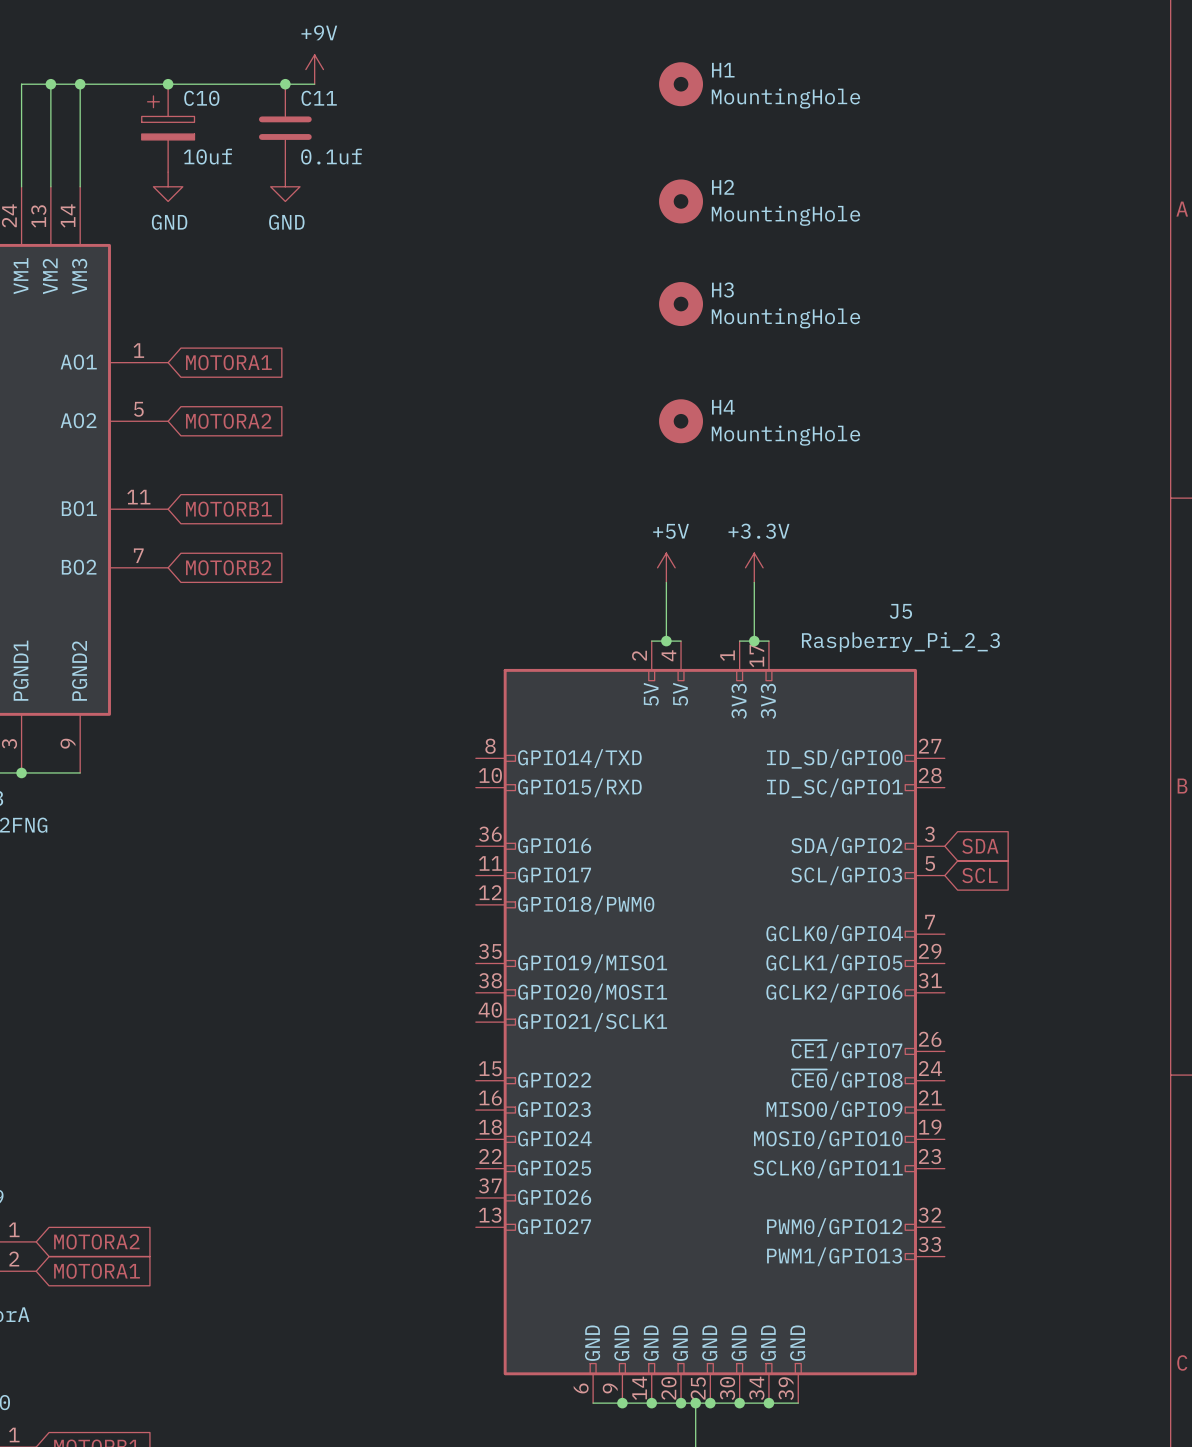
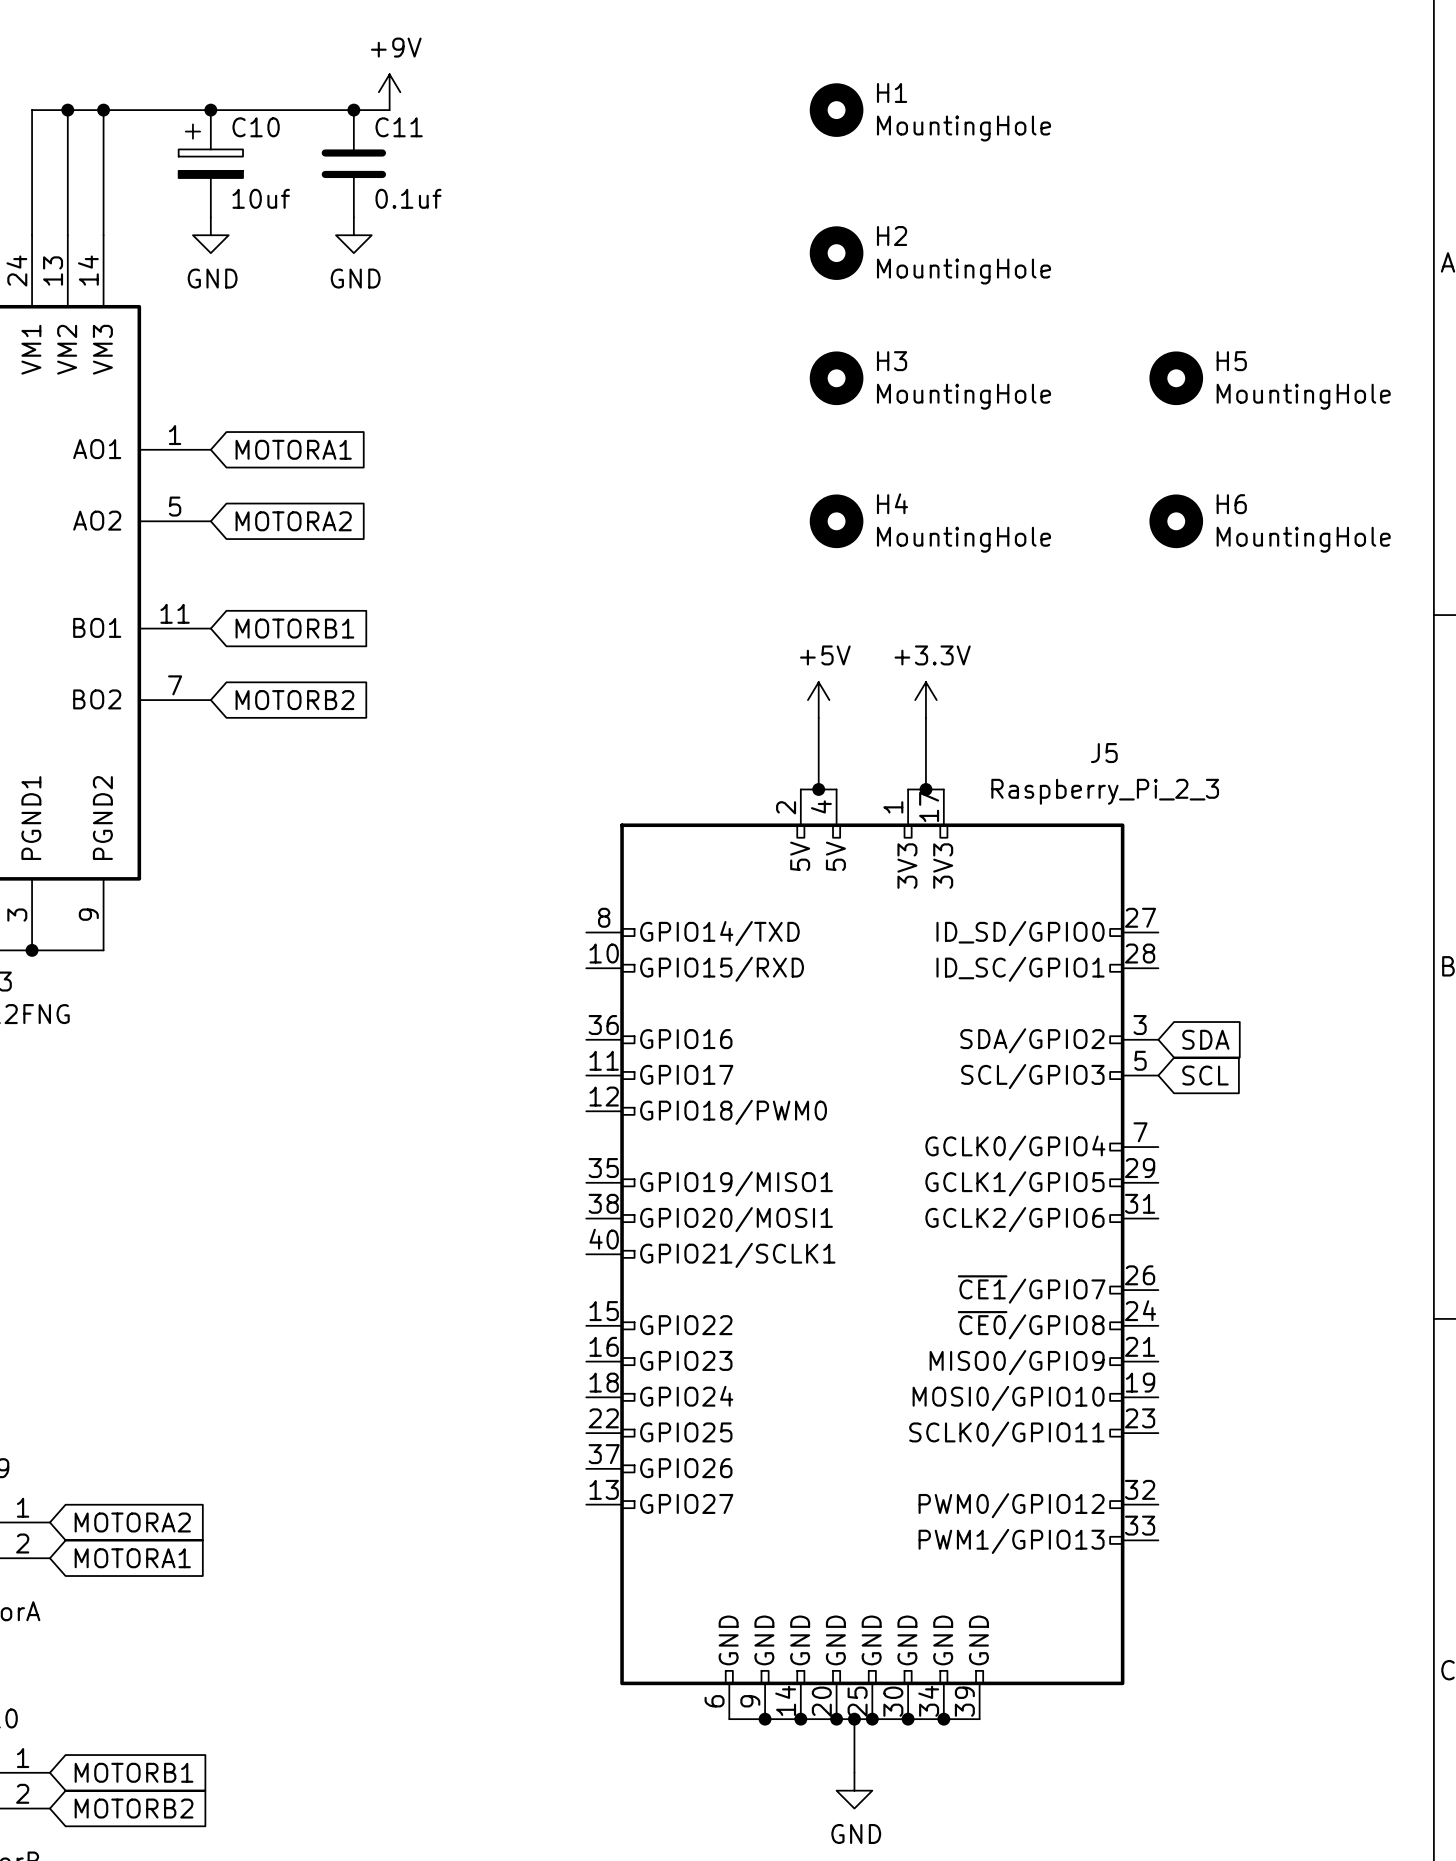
H5: none -> MountingHole (1176, 378)
H6: none -> MountingHole (1176, 521)

